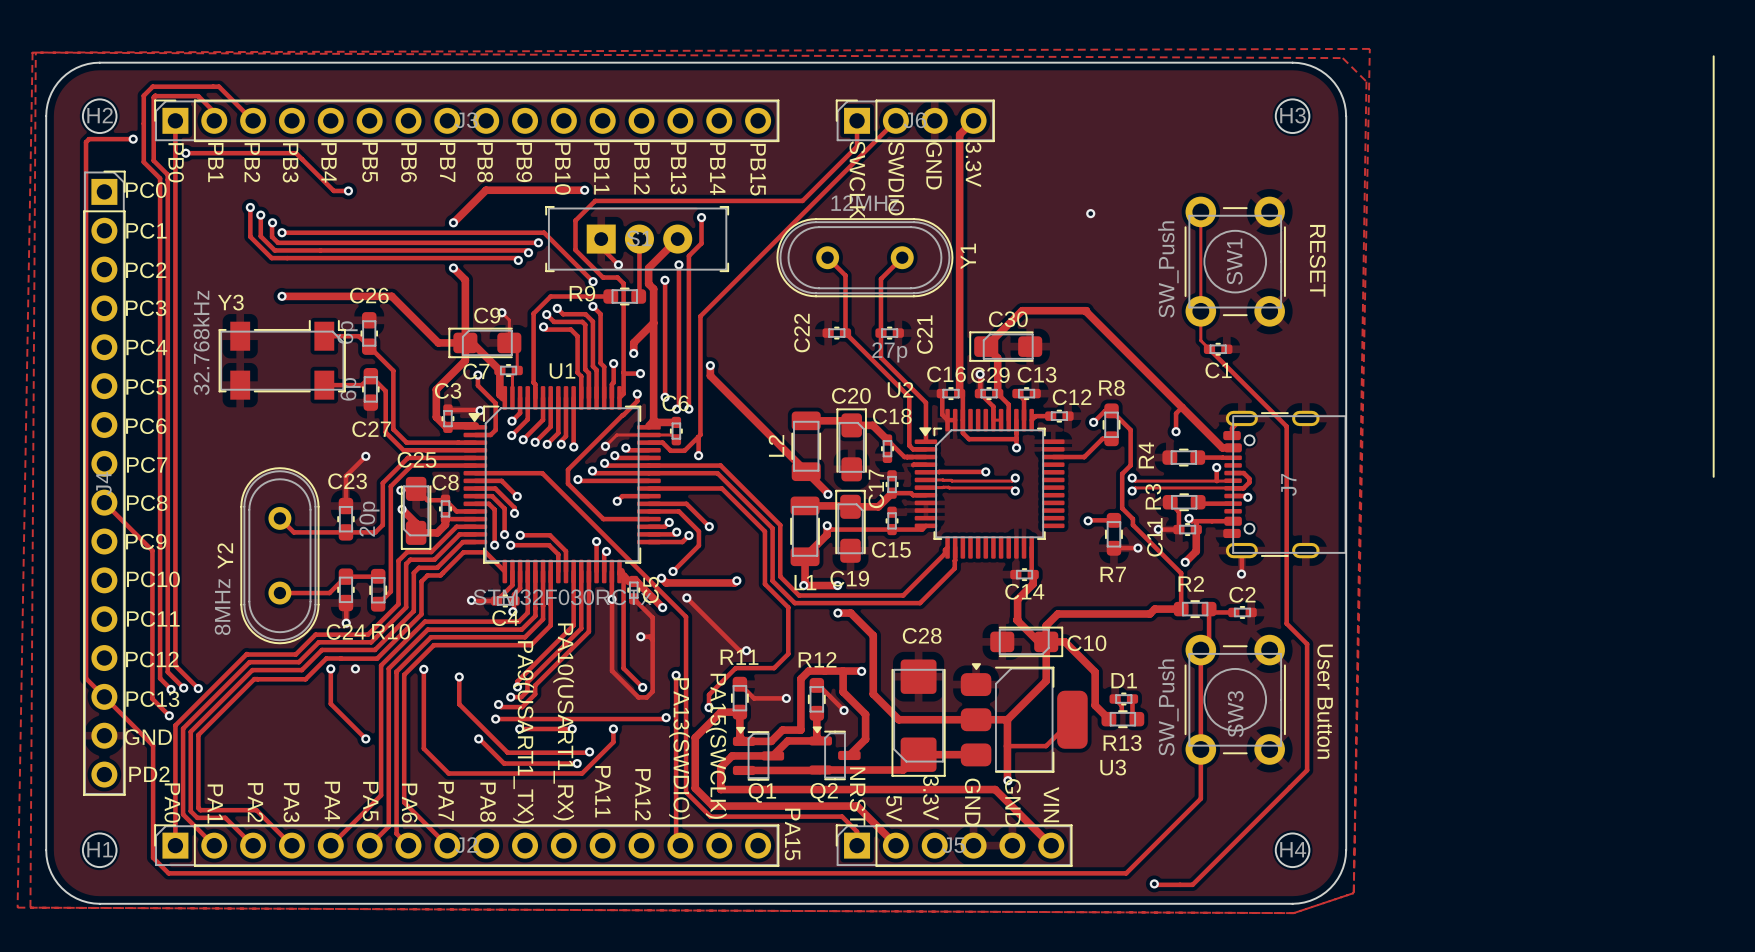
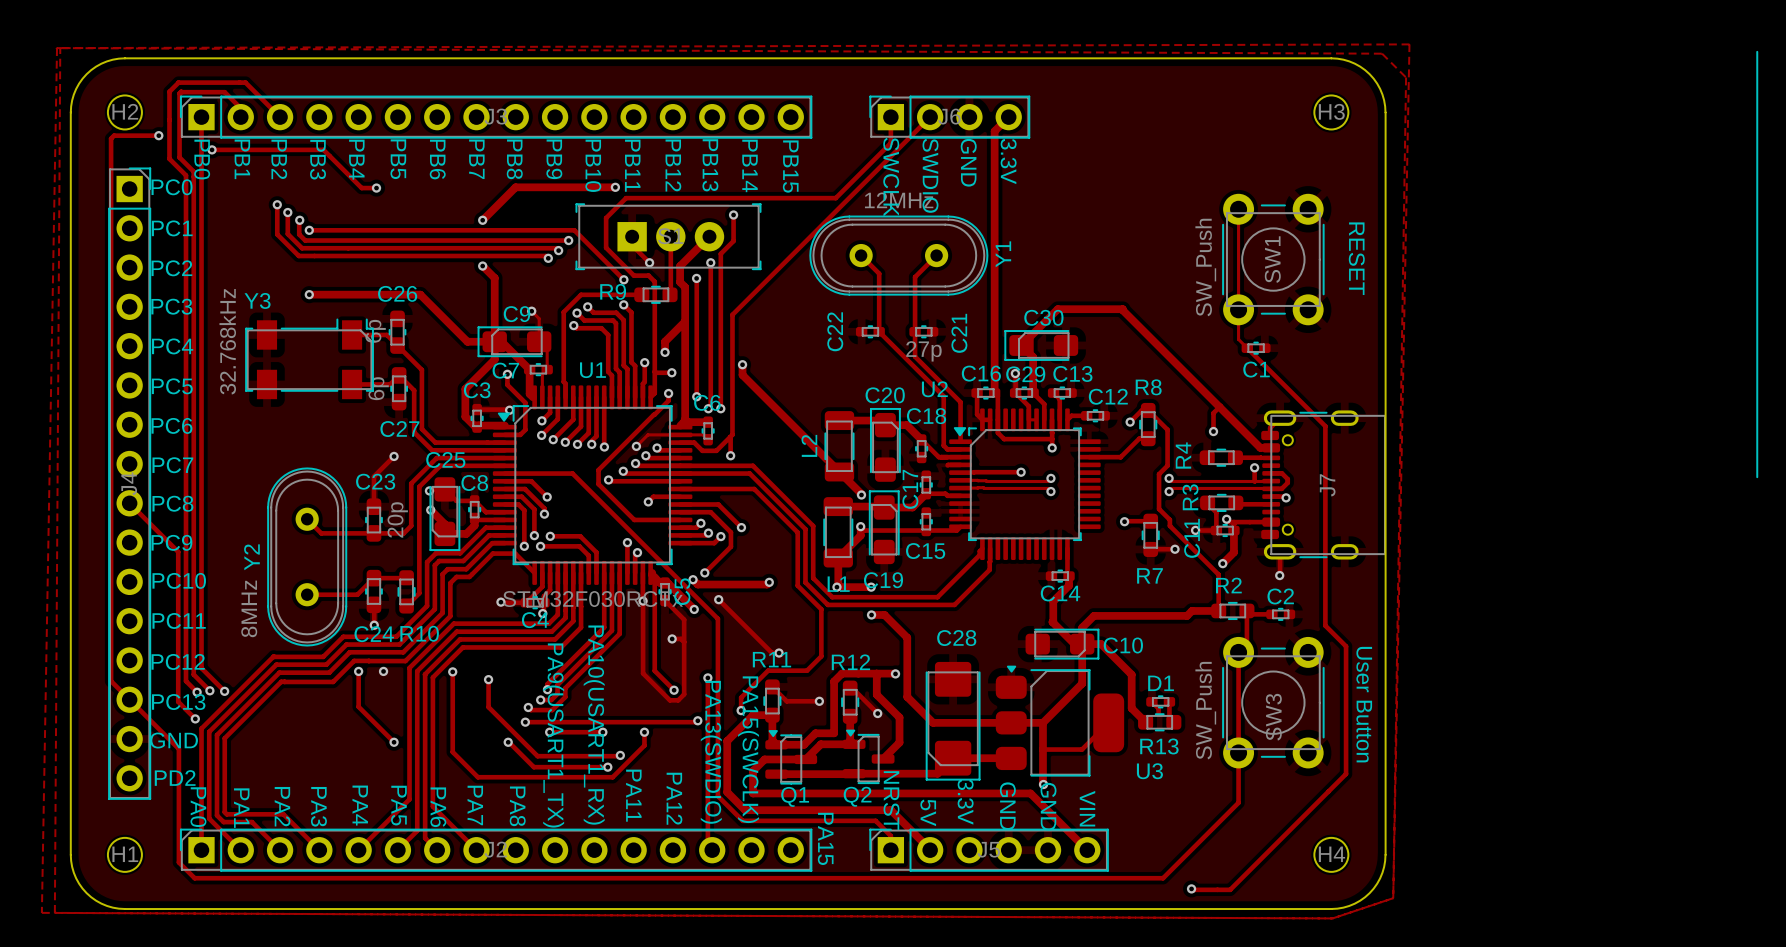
via: (1090, 213) -> none

